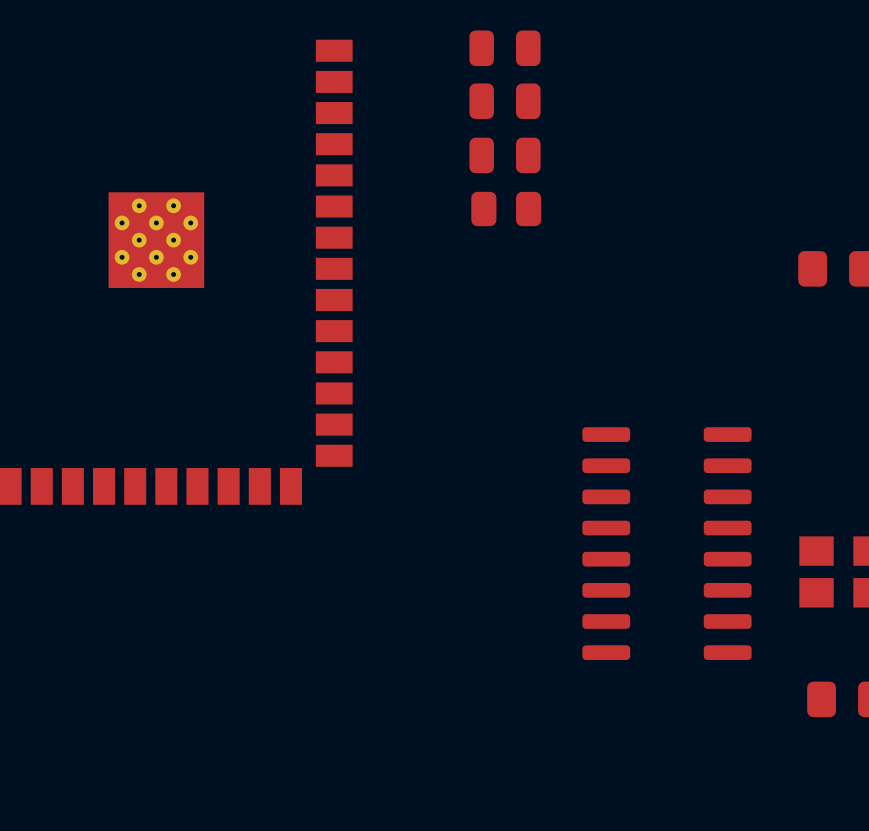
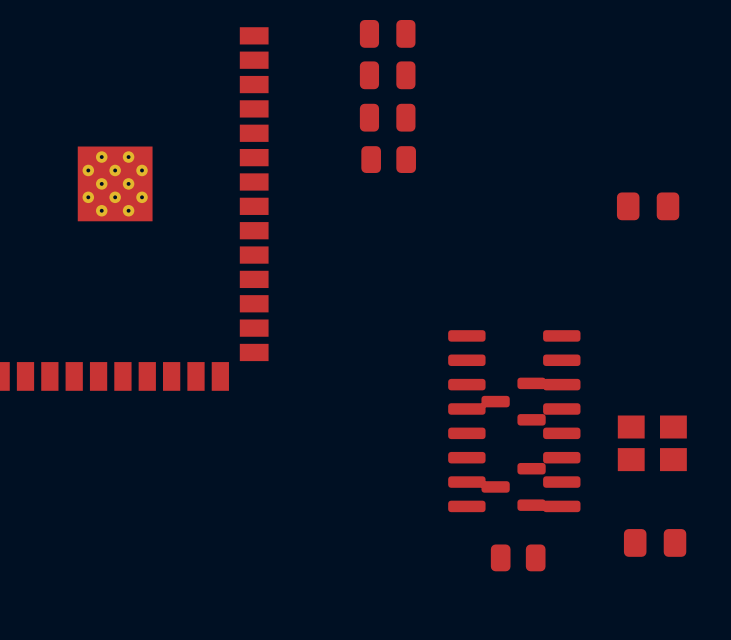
part: none -> (513, 401)
part: none -> (513, 486)
part: none -> (518, 557)

